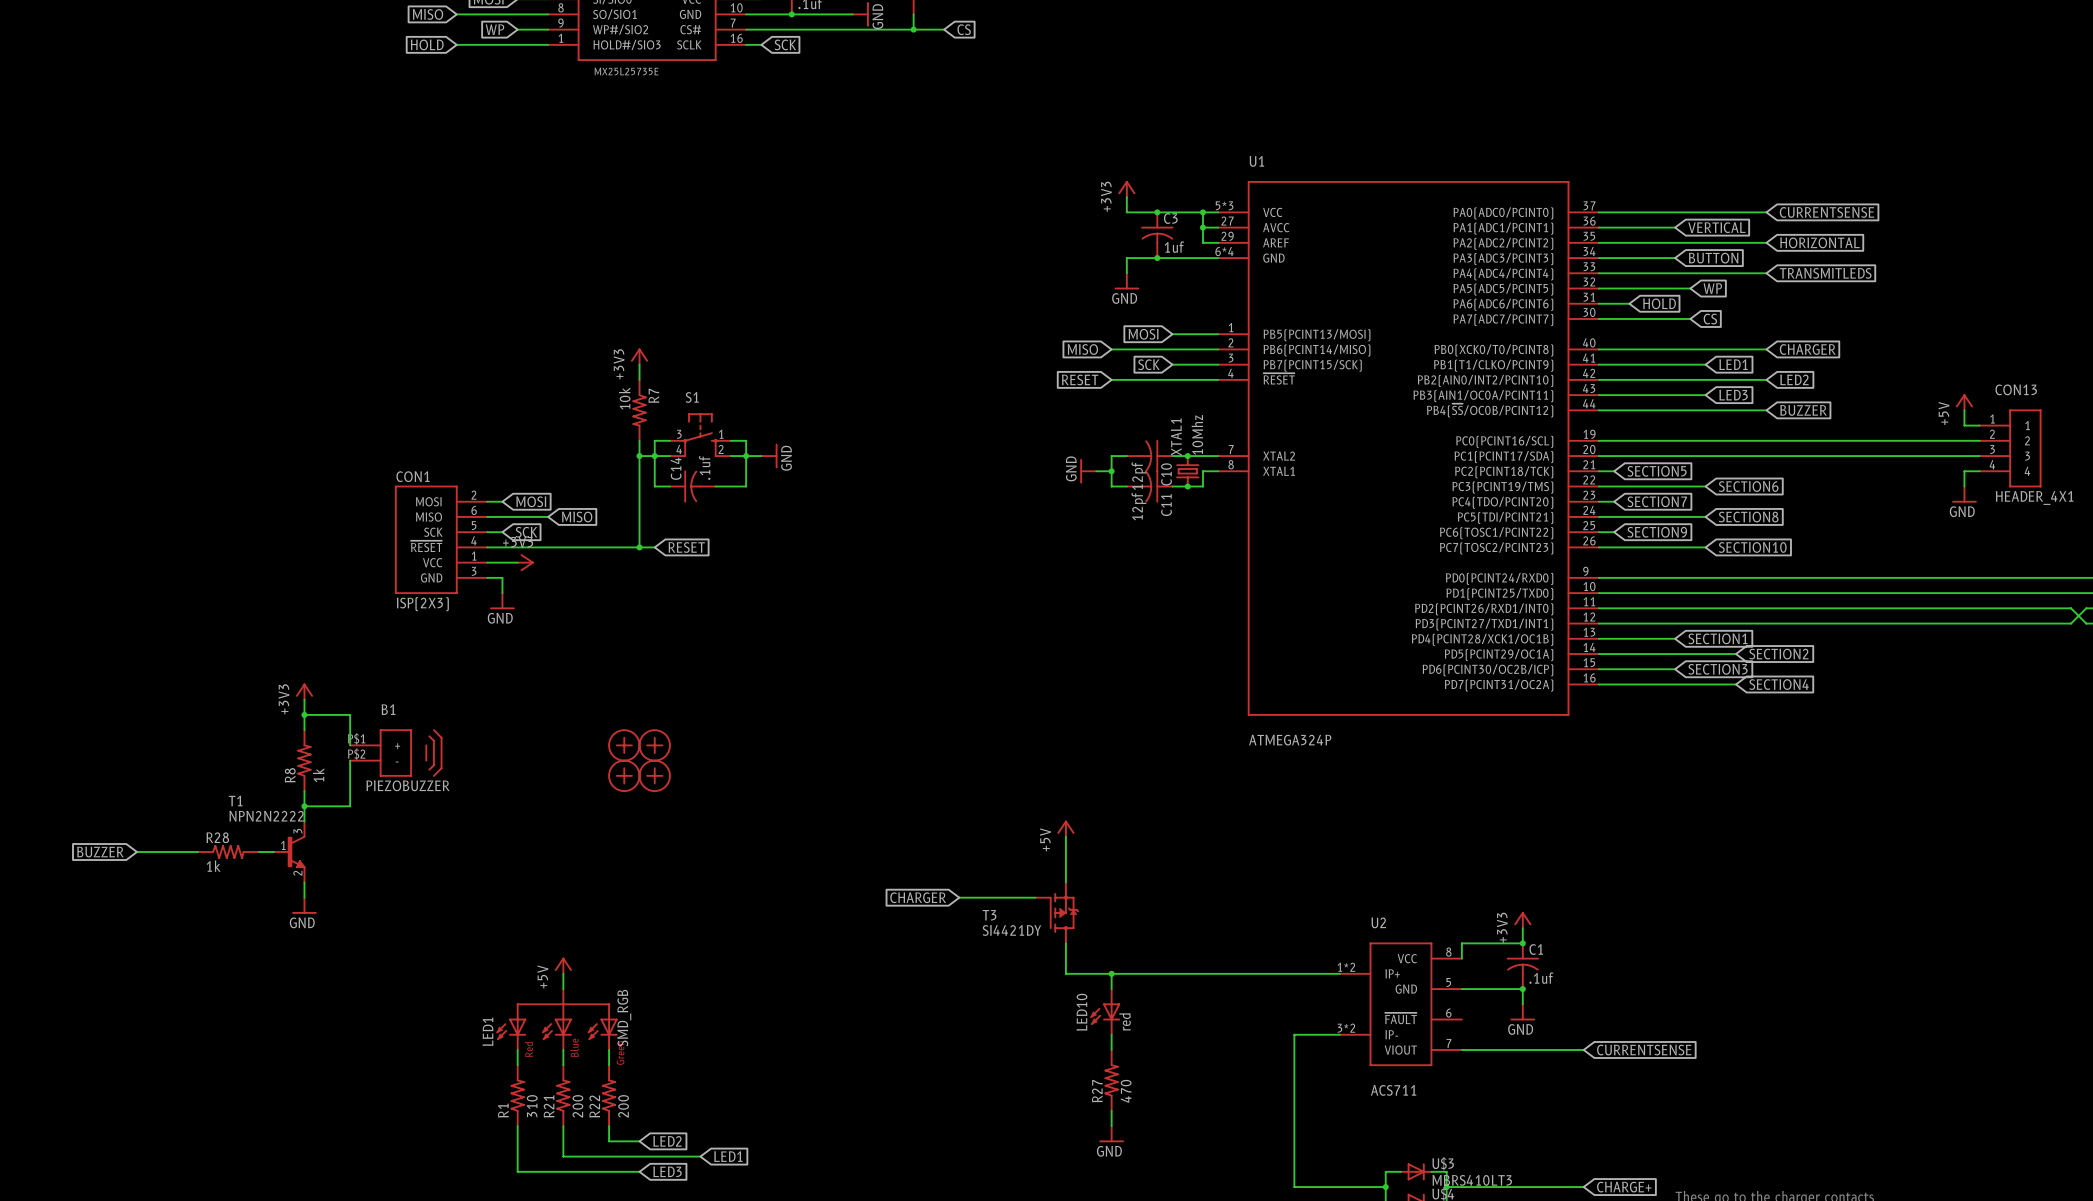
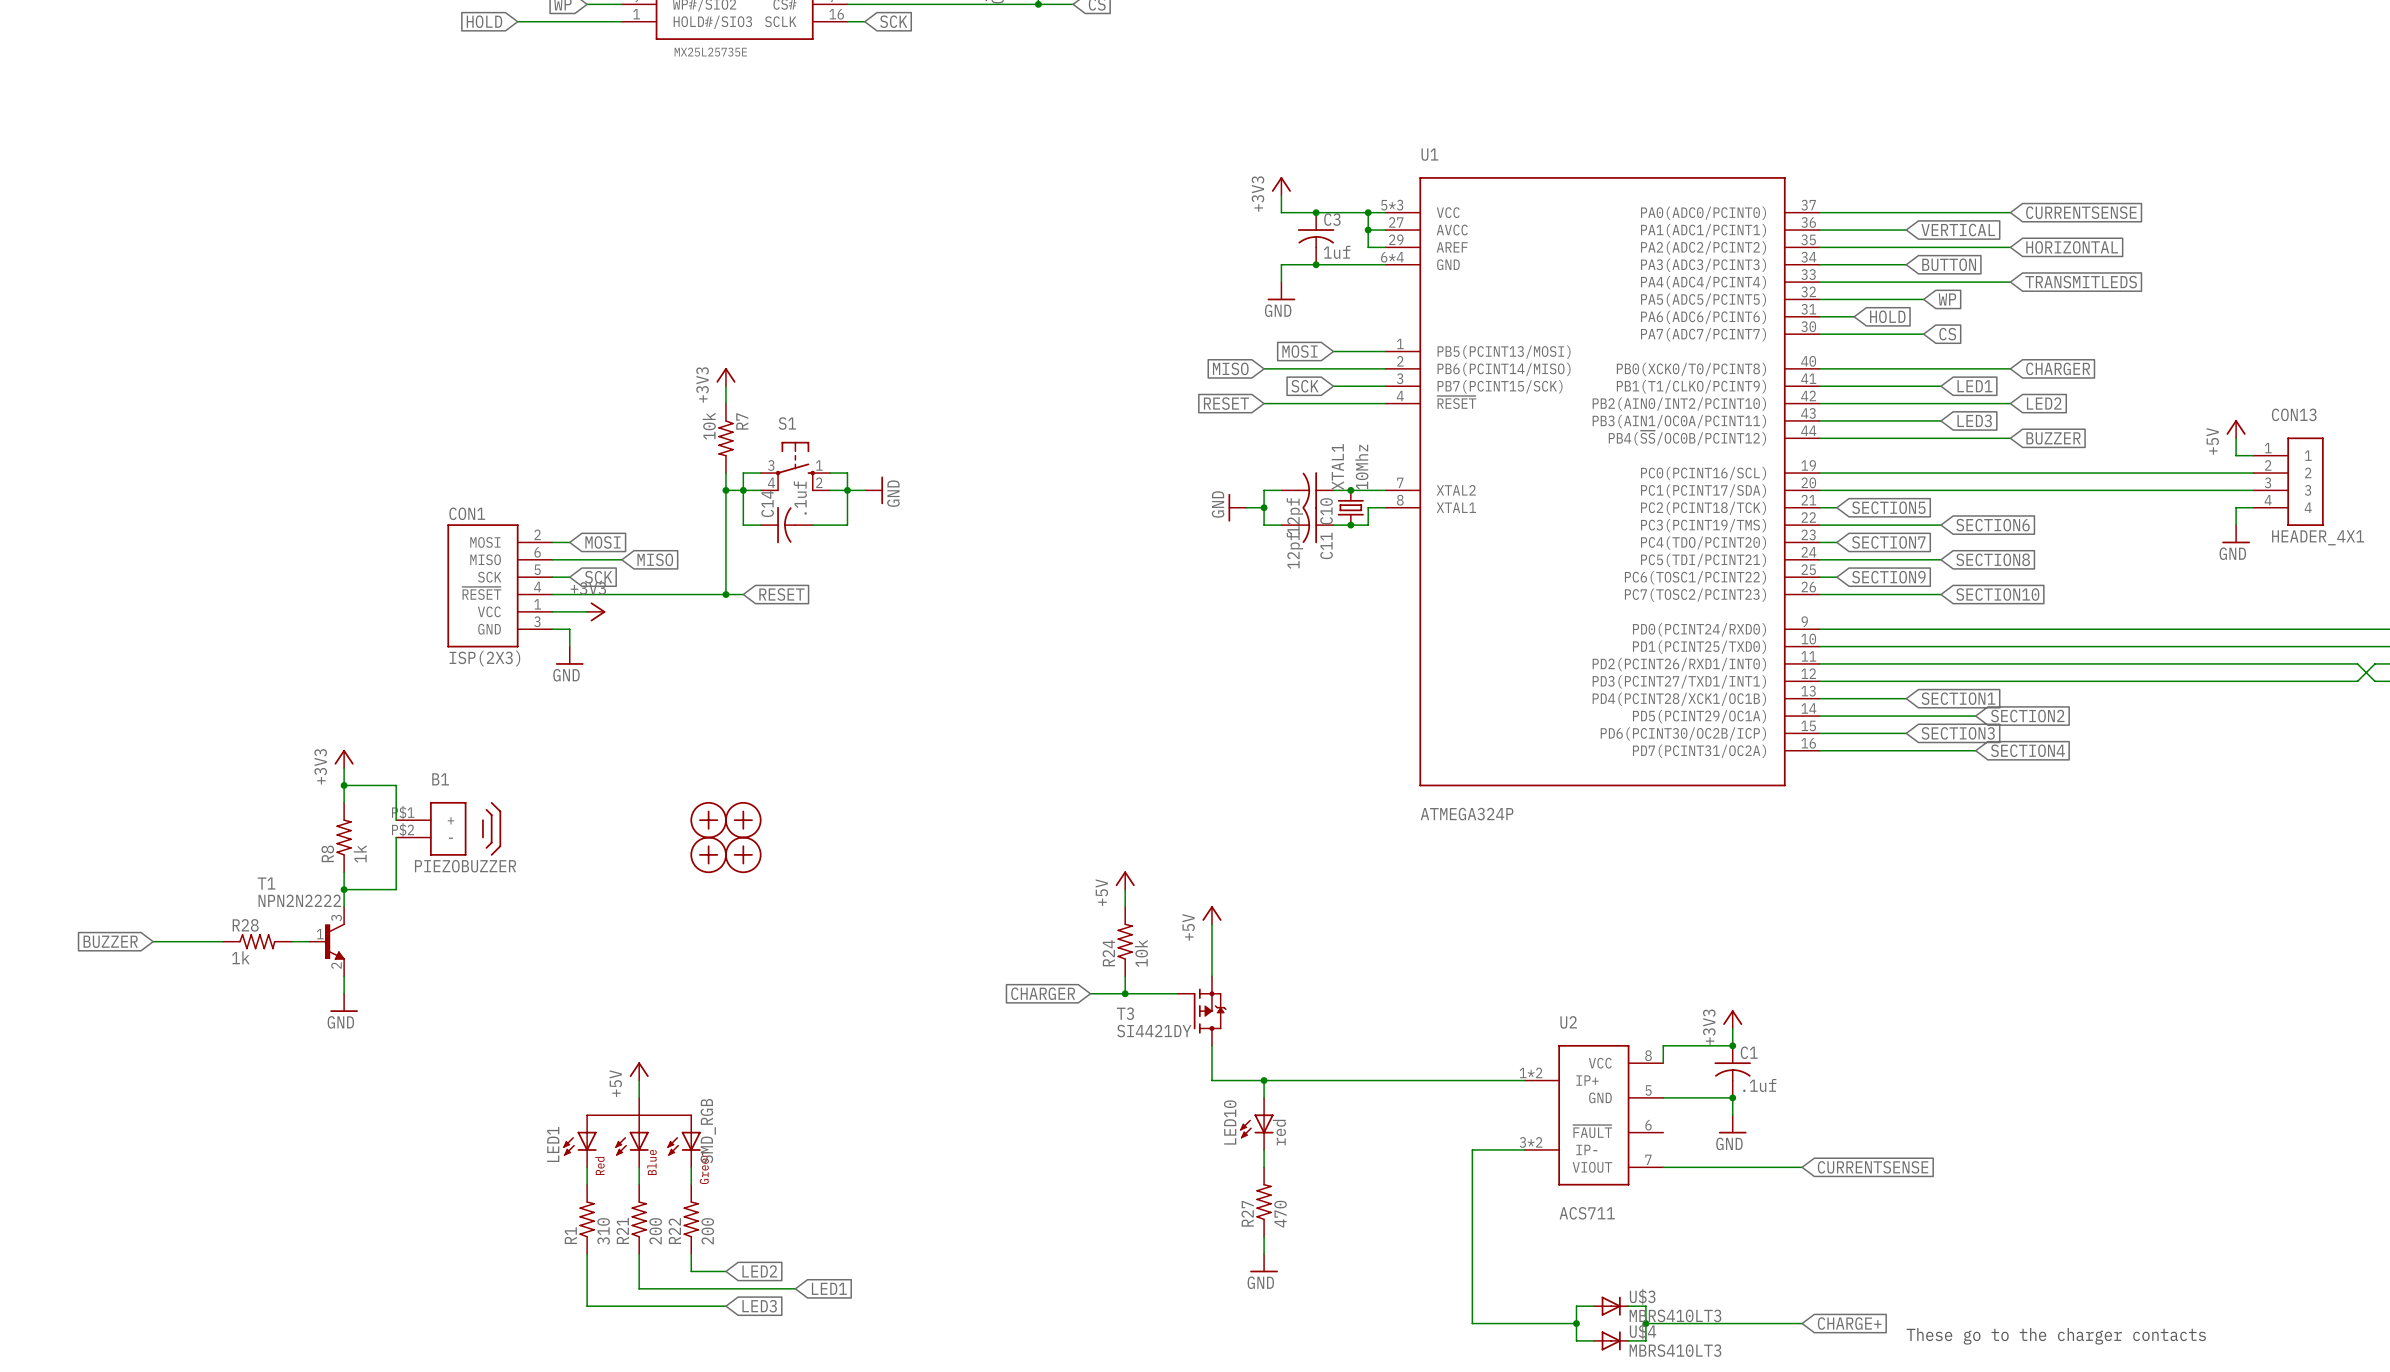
power symbol: none -> +5V (1125, 880)
wire: none -> (1125, 889) (1125, 906)
R24: none -> 10k (1125, 941)
wire: none -> (1125, 976) (1125, 993)
junction: none -> (1125, 993)

